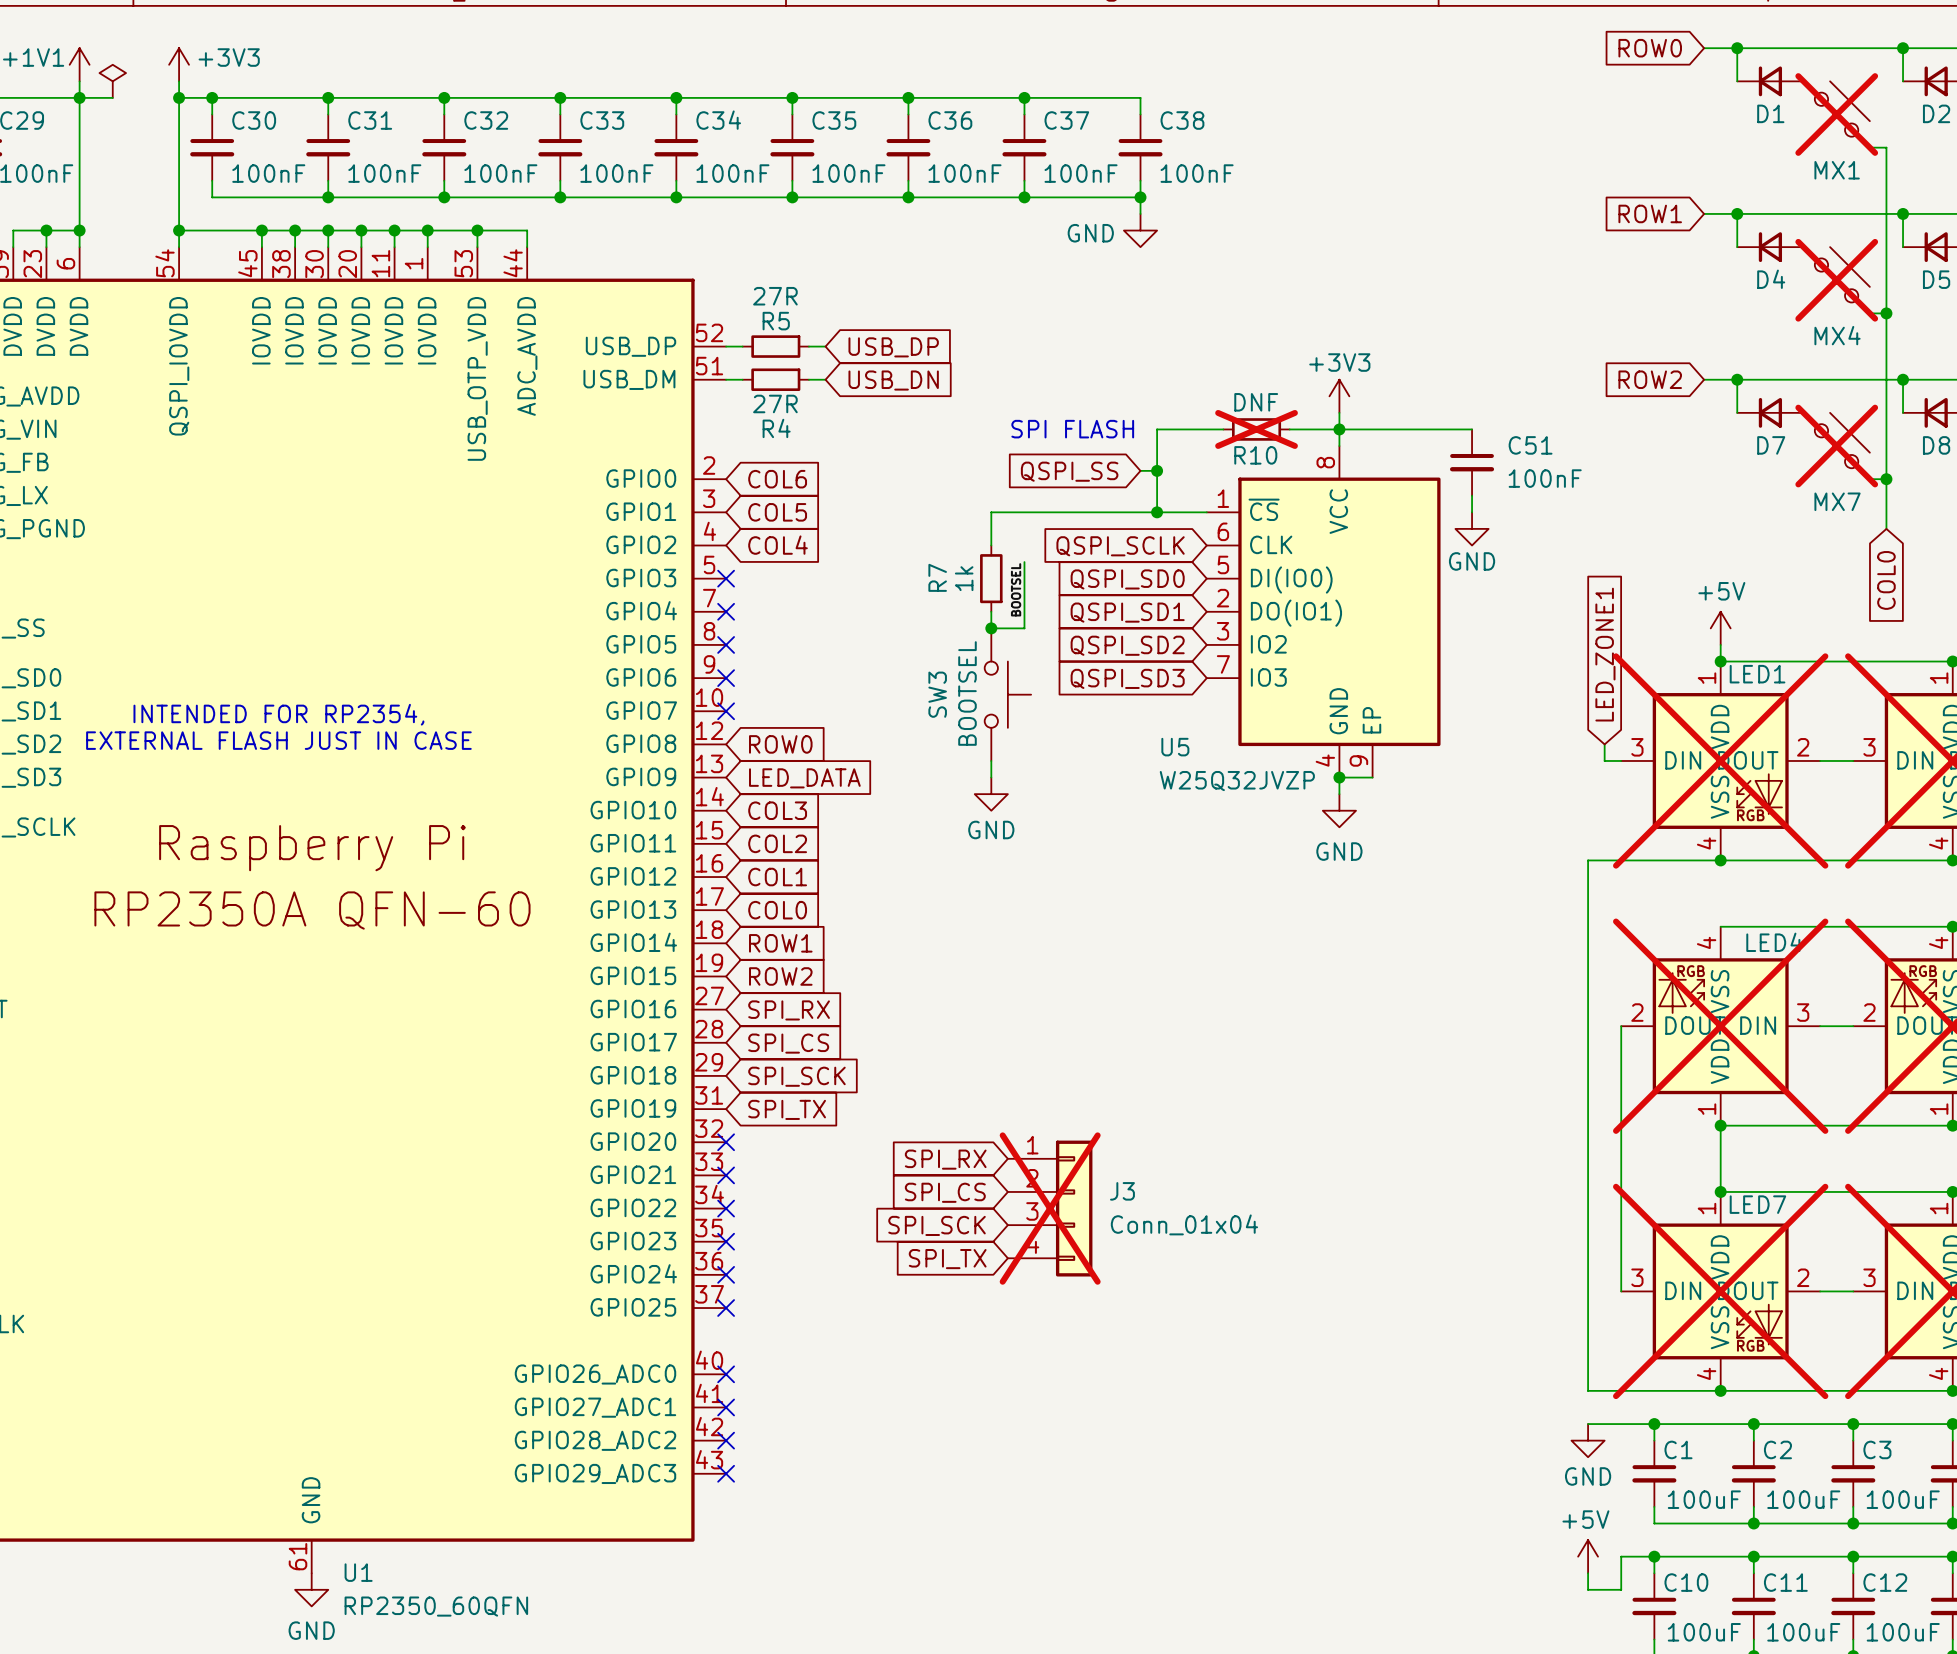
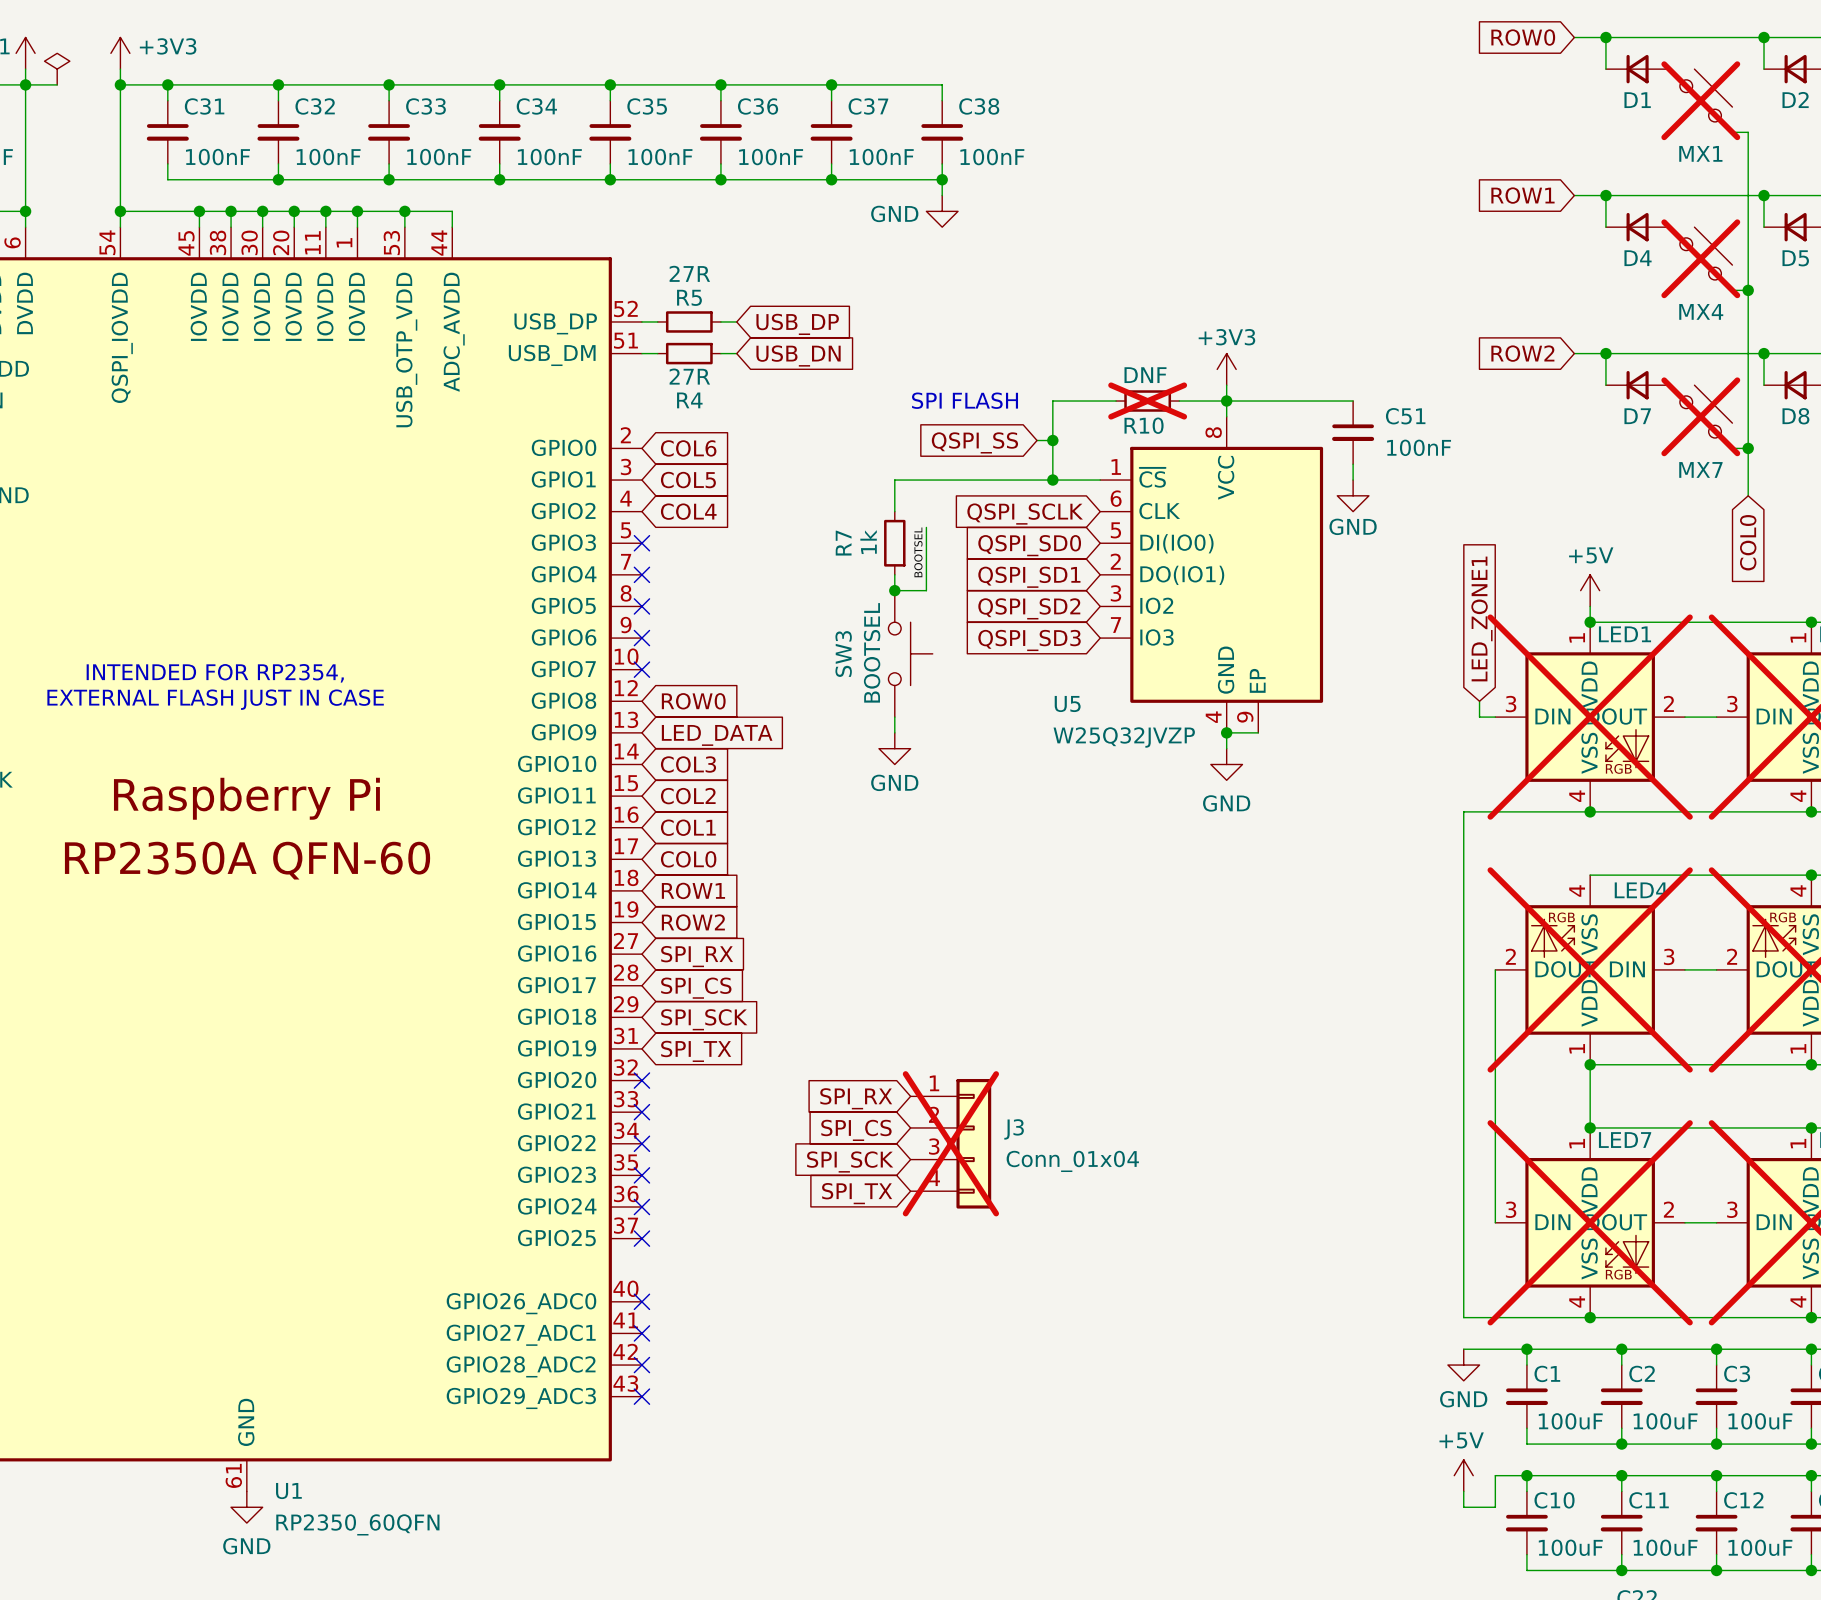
wire: (212, 97) (212, 114) -> none
junction position: (212, 97) -> (167, 84)
wire: (328, 97) (328, 114) -> (167, 84) (167, 100)
junction position: (328, 97) -> (278, 84)
wire: (444, 97) (444, 114) -> (278, 84) (278, 100)
junction position: (444, 97) -> (389, 84)
wire: (560, 97) (560, 114) -> (389, 84) (389, 100)
junction position: (560, 97) -> (499, 84)
wire: (676, 97) (676, 114) -> (499, 84) (499, 100)
junction position: (676, 97) -> (610, 84)
wire: (792, 97) (792, 114) -> (610, 84) (610, 100)
junction position: (792, 97) -> (720, 84)
wire: (908, 97) (908, 114) -> (720, 84) (720, 100)
junction position: (908, 97) -> (831, 84)
wire: (1024, 97) (1024, 114) -> (831, 84) (831, 100)
junction: (1024, 97) -> none
wire: (1041, 97) (1140, 97) (1140, 114) -> (942, 84) (942, 100)
C30: 100nF (212, 147) -> none
C31 position: (328, 147) -> (167, 132)
C32 position: (444, 147) -> (278, 132)
C33 position: (560, 147) -> (389, 132)
C34 position: (676, 147) -> (499, 132)
C35 position: (792, 147) -> (610, 132)
C36 position: (908, 147) -> (720, 132)
C37 position: (1024, 147) -> (831, 132)
C38 position: (1140, 147) -> (942, 132)
wire: (212, 180) (212, 197) (228, 197) -> (167, 163) (167, 179)
wire: (328, 180) (328, 197) -> none
wire: (444, 180) (444, 197) -> (278, 163) (278, 179)
wire: (560, 180) (560, 197) -> (389, 163) (389, 179)
wire: (676, 180) (676, 197) -> (499, 163) (499, 179)
wire: (792, 180) (792, 197) -> (610, 163) (610, 179)
wire: (908, 180) (908, 197) -> (720, 163) (720, 179)
wire: (1024, 180) (1024, 197) -> (831, 163) (831, 179)
wire: (1140, 180) (1140, 213) -> (942, 163) (942, 195)
junction position: (328, 197) -> (278, 179)
junction position: (444, 197) -> (389, 179)
junction position: (560, 197) -> (499, 179)
junction position: (676, 197) -> (610, 179)
junction position: (792, 197) -> (720, 179)
junction position: (908, 197) -> (831, 179)
junction position: (1024, 197) -> (942, 179)
wire: (1041, 197) (1140, 197) -> none
junction: (1140, 197) -> none
power symbol position: GND (1140, 230) -> GND (942, 211)

